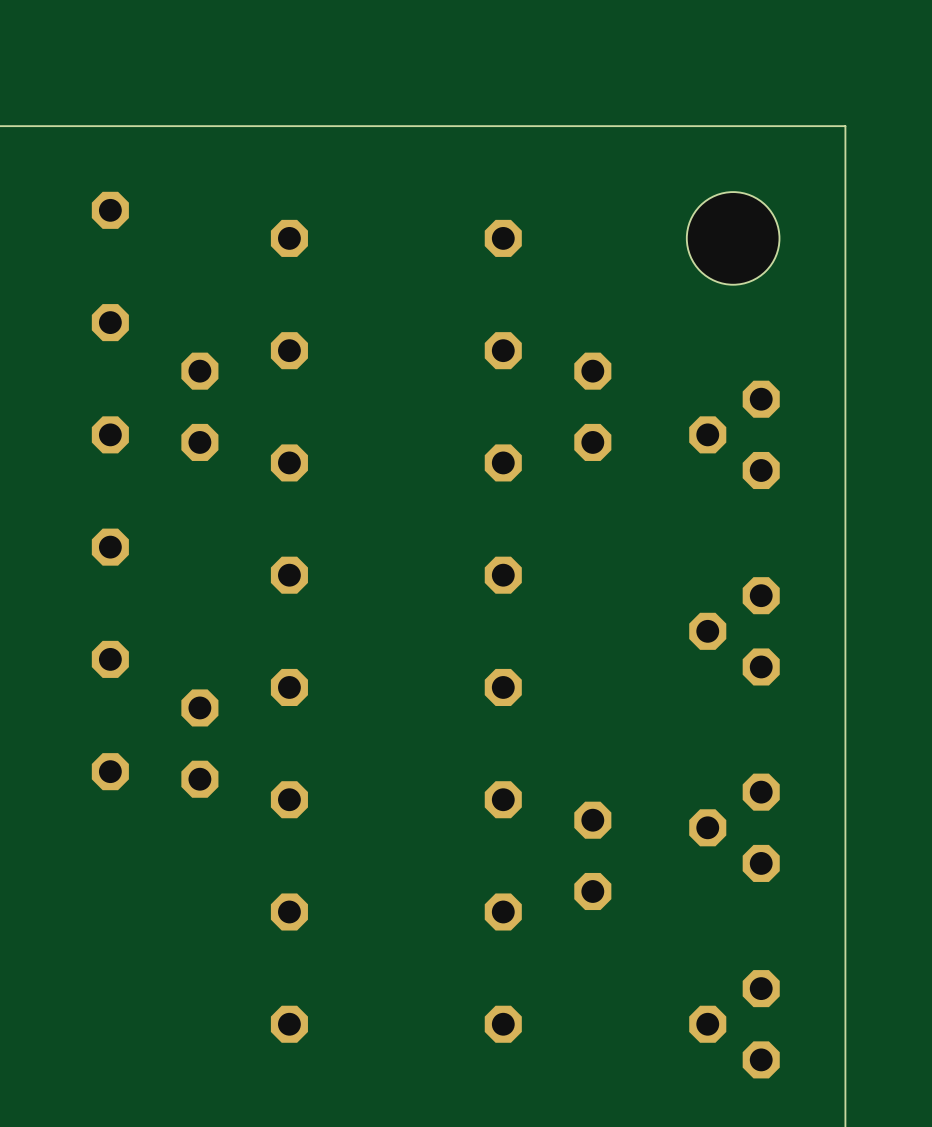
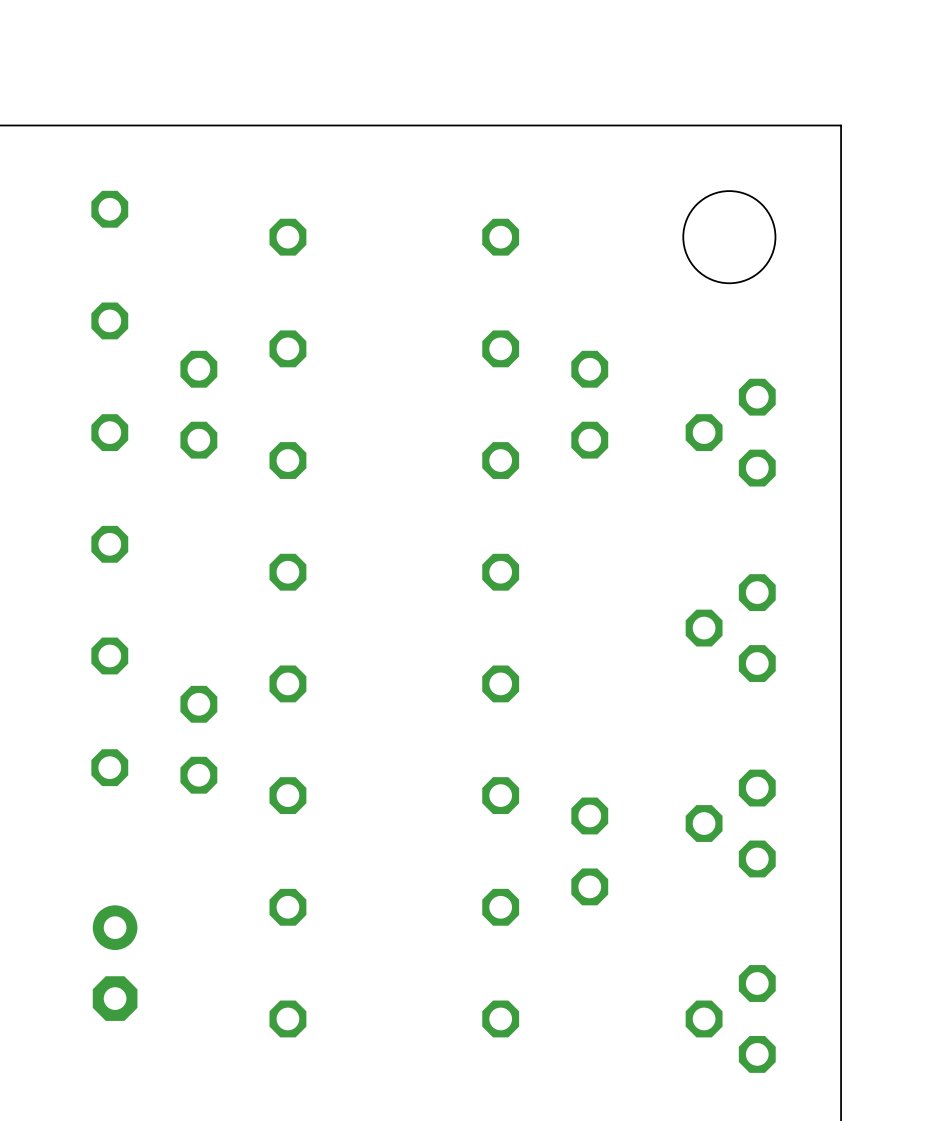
part: none -> (115, 963)

